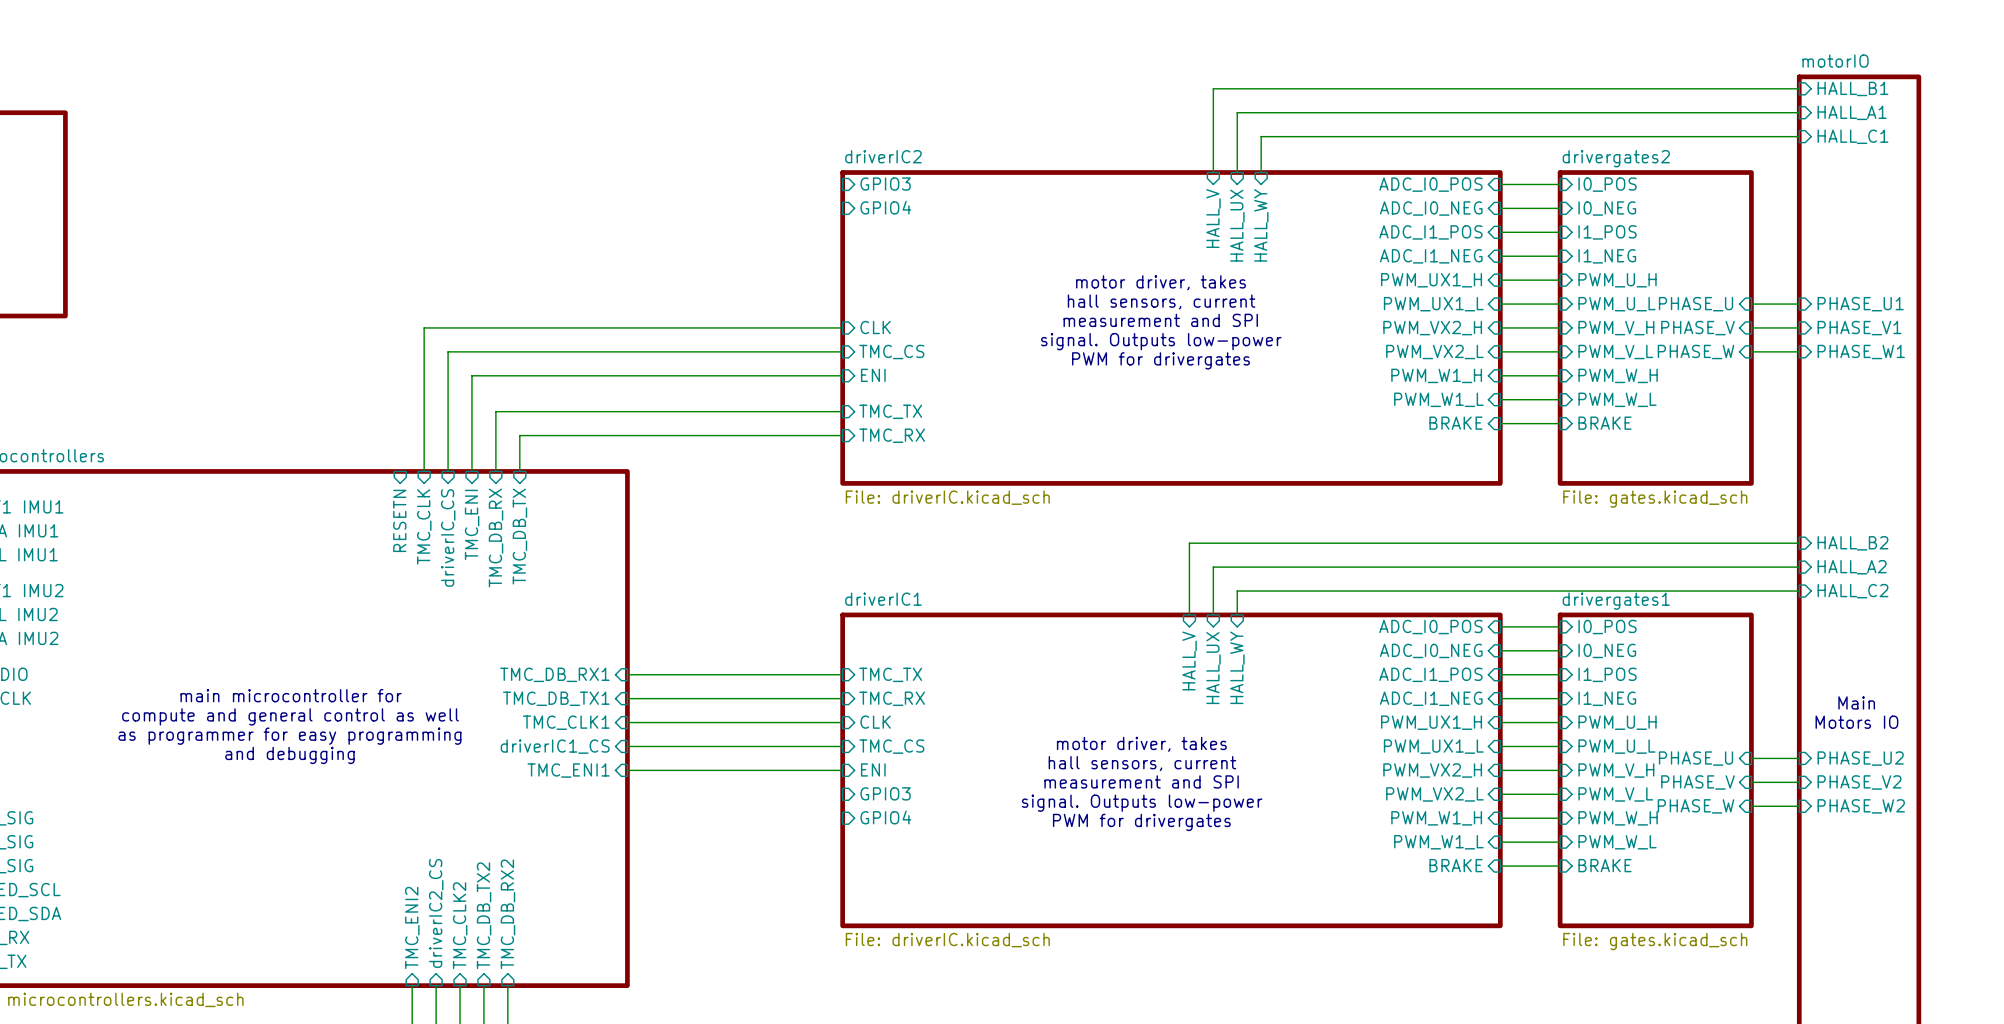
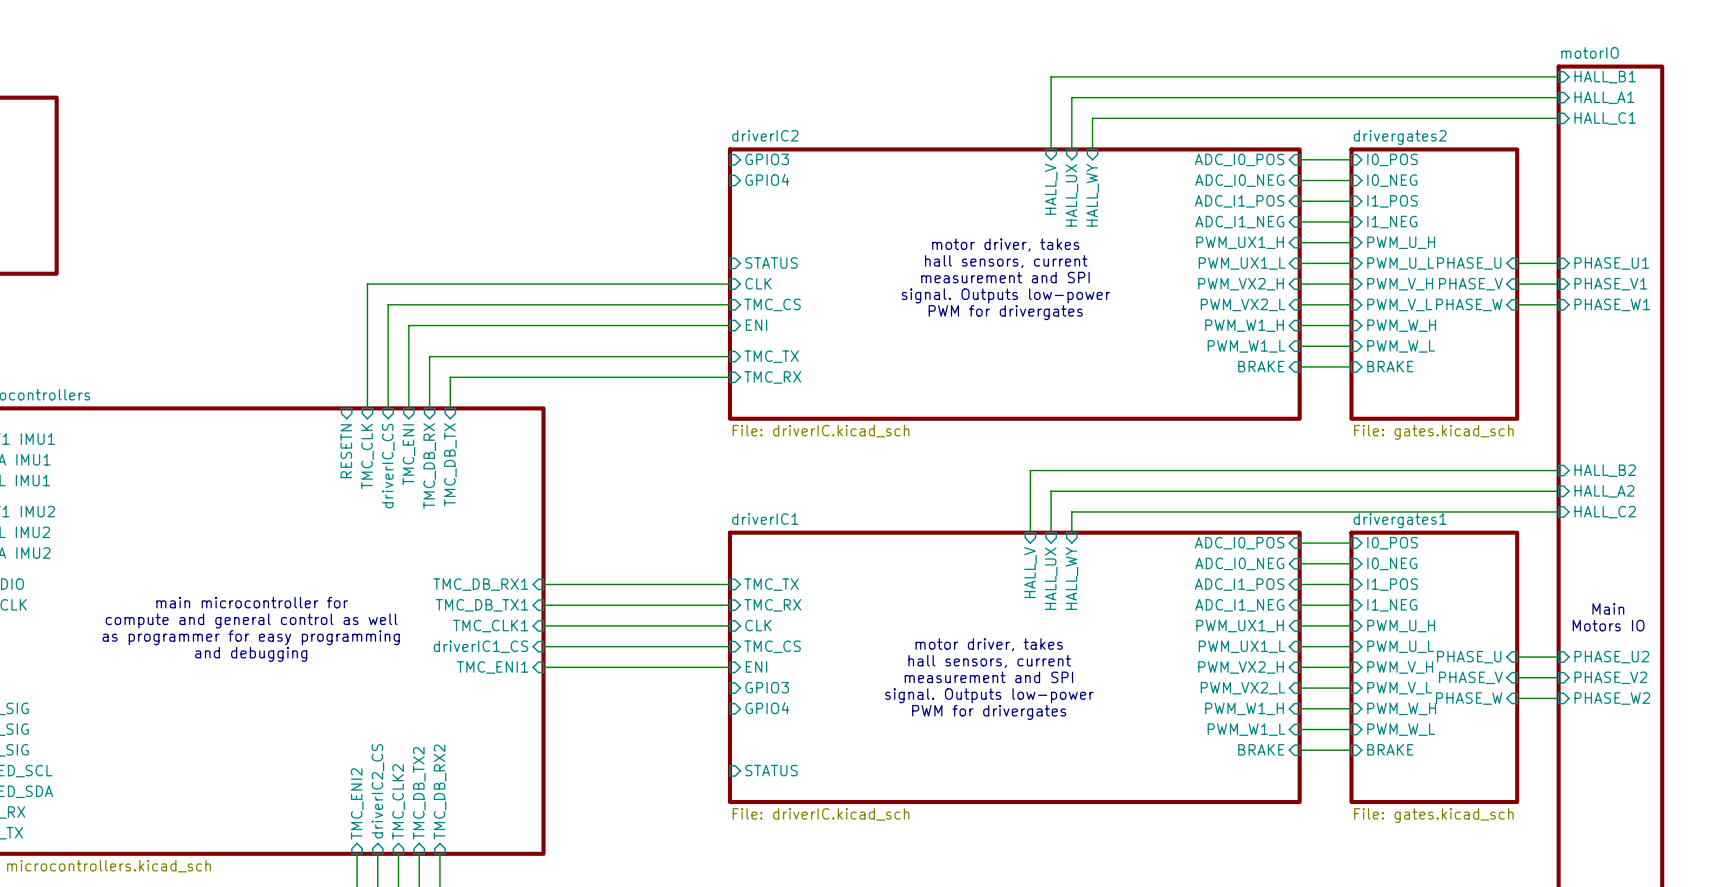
sheet pin: none -> STATUS (771, 263)
sheet pin: none -> STATUS (771, 770)

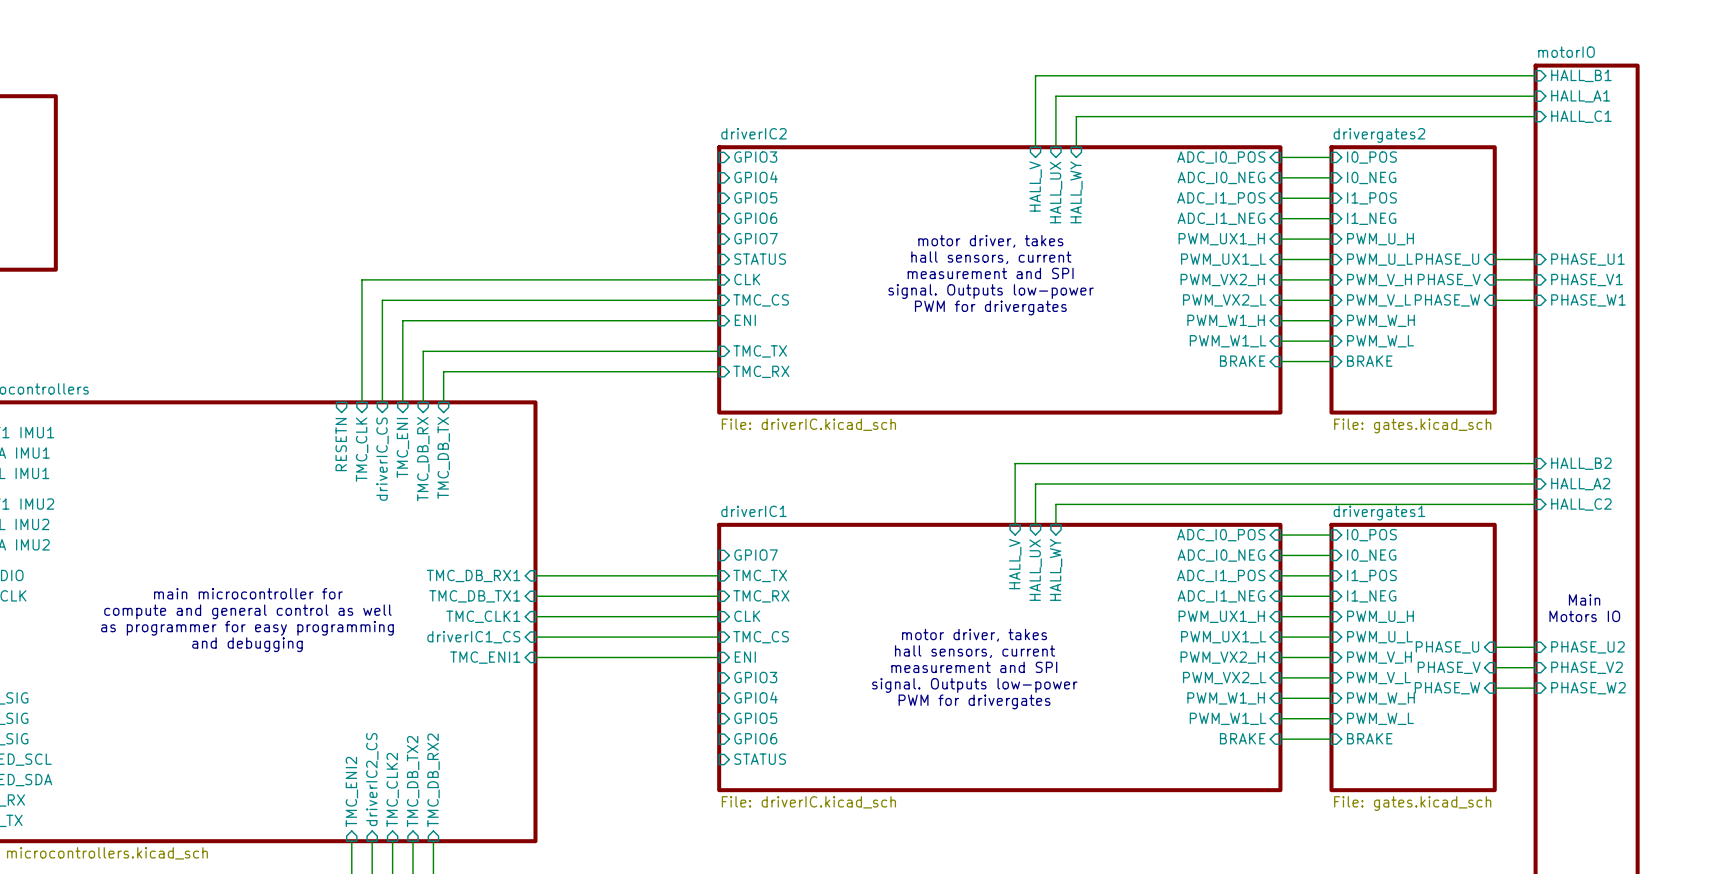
sheet pin: none -> GPIO5 (755, 197)
sheet pin: none -> GPIO6 (755, 218)
sheet pin: none -> GPIO7 (756, 238)
sheet pin: none -> GPIO7 (756, 555)
sheet pin: none -> GPIO5 (755, 718)
sheet pin: none -> GPIO6 (755, 738)

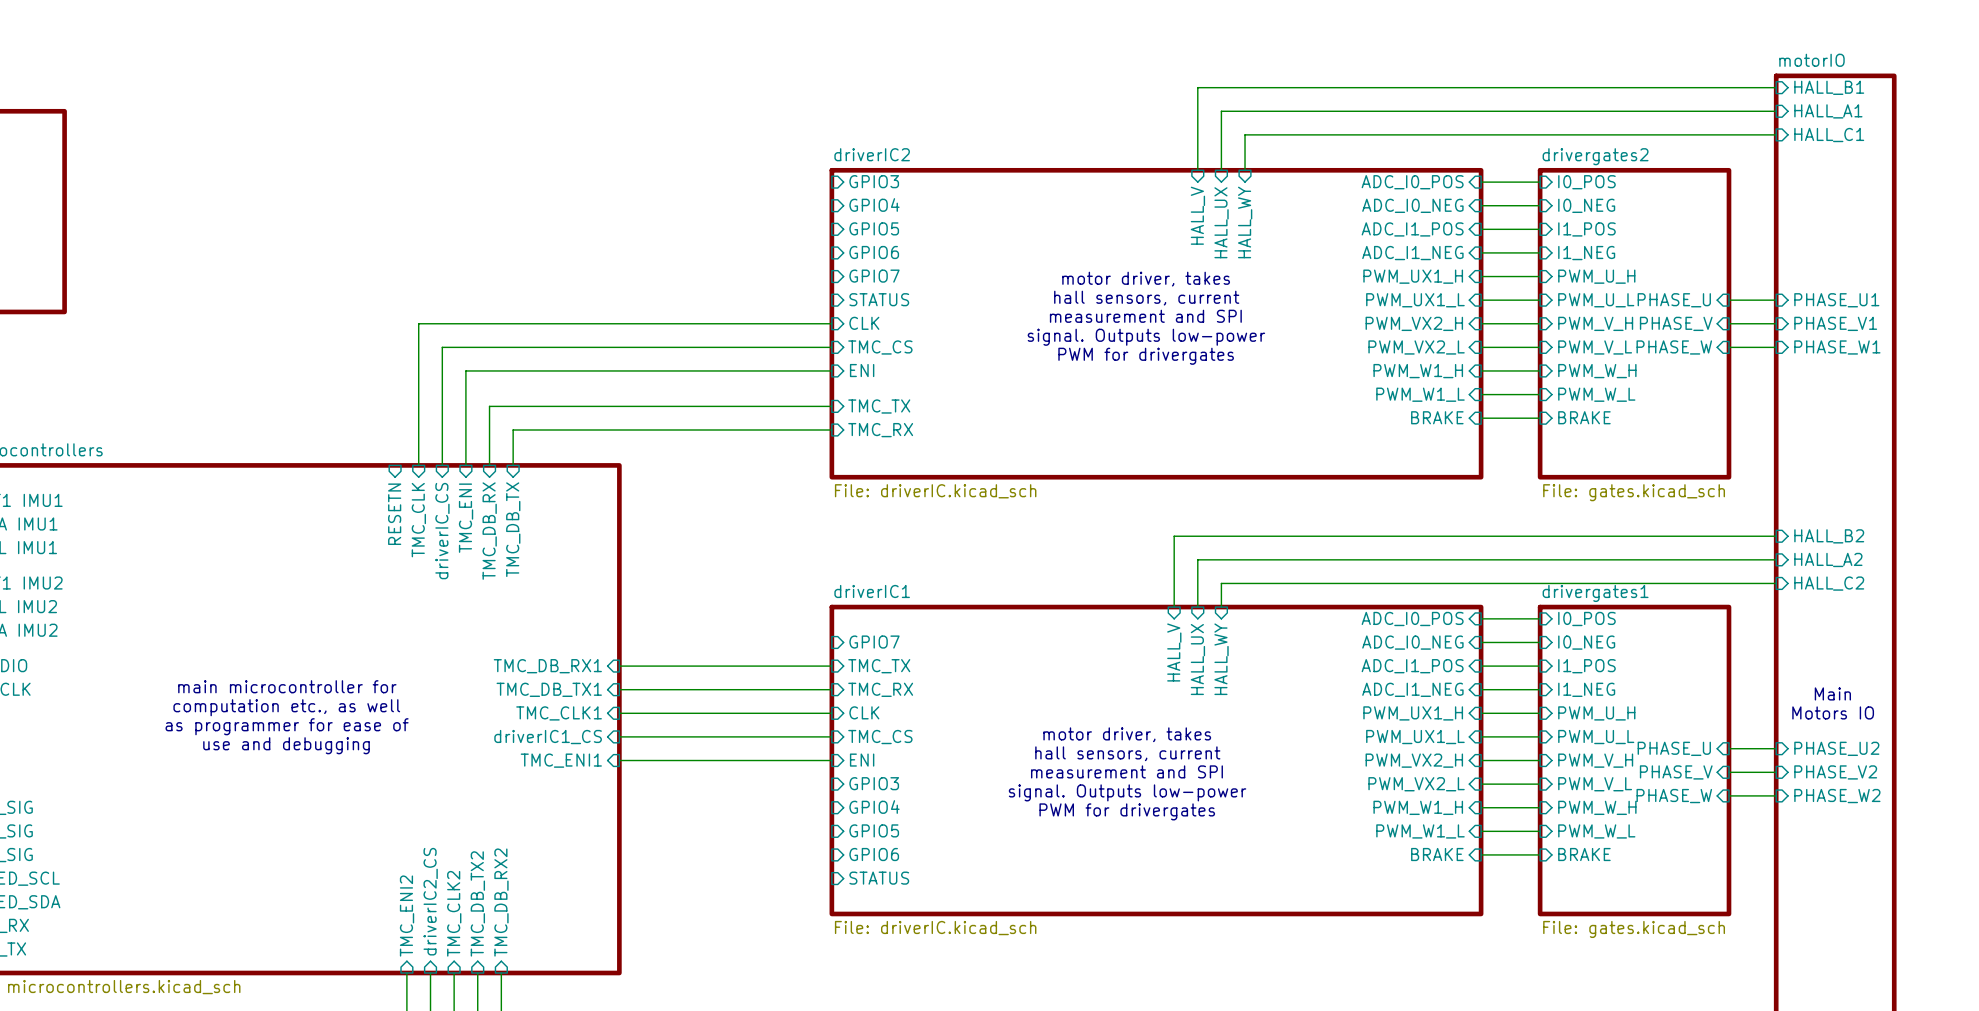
text: compute and general control as well (247, 611) -> computation etc., as well (286, 707)
text: as programmer for easy programming (247, 628) -> as programmer for ease of (287, 726)
text: and debugging (247, 644) -> use and debugging (286, 745)

